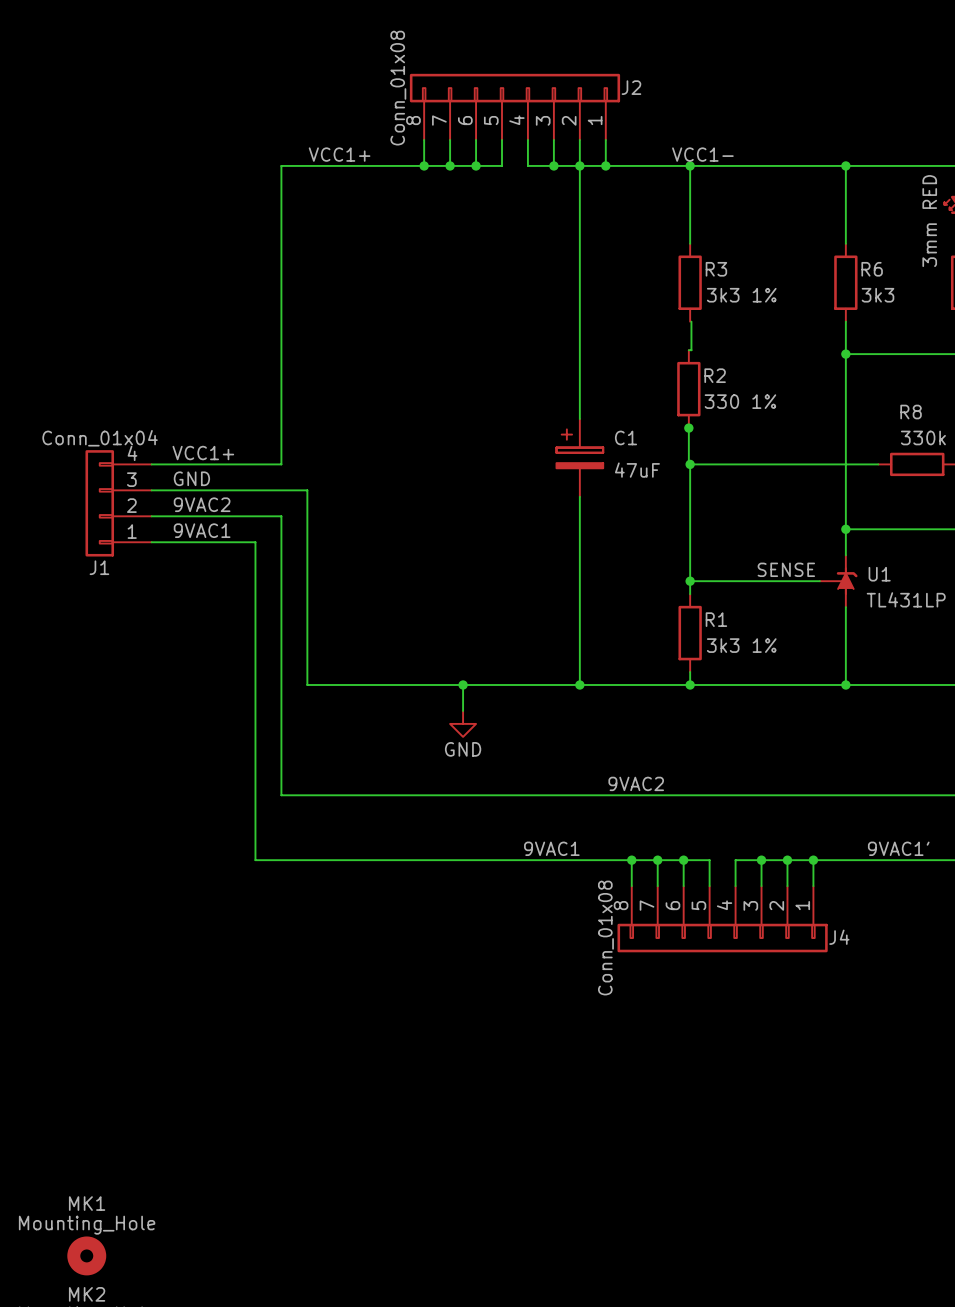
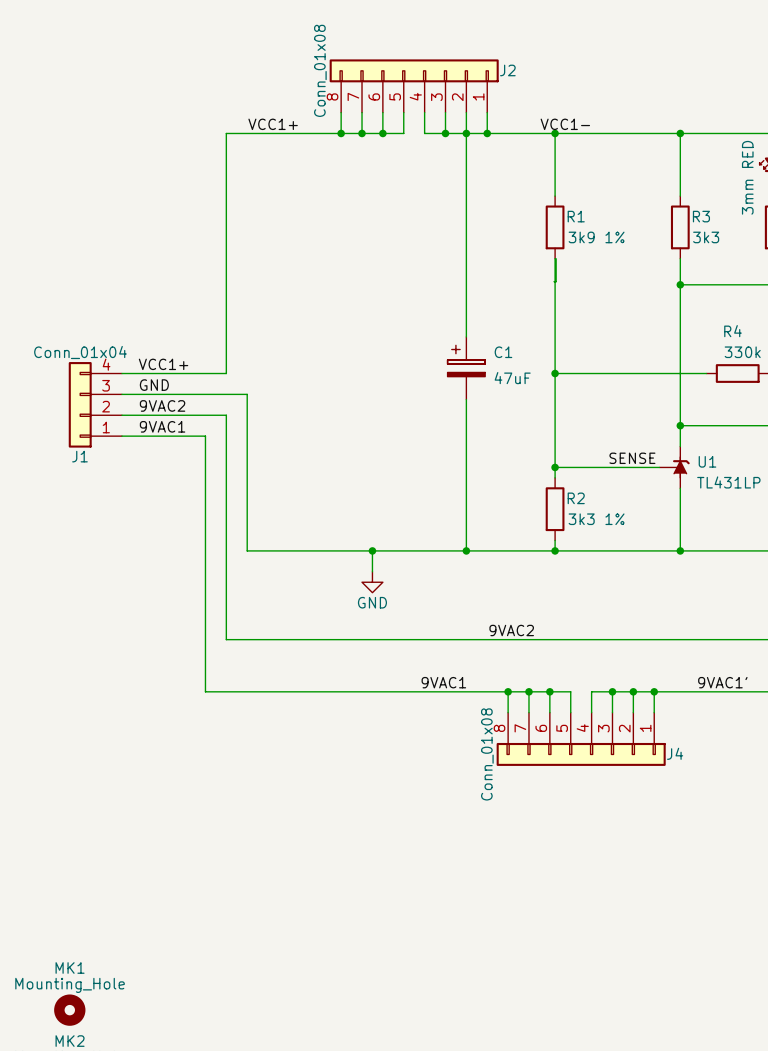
R3 name: R3 (716, 269) -> R1 (576, 216)
R6 name: R6 (872, 269) -> R3 (701, 216)
R3 value: 3k3 1% (741, 295) -> 3k9 1% (596, 237)
R2: 330 1% (688, 389) -> none
R8 name: R8 (911, 412) -> R4 (733, 331)
wire: (688, 425) (690, 464) -> (555, 258) (555, 373)
junction: (688, 428) -> none
R1 name: R1 (716, 619) -> R2 (576, 498)

